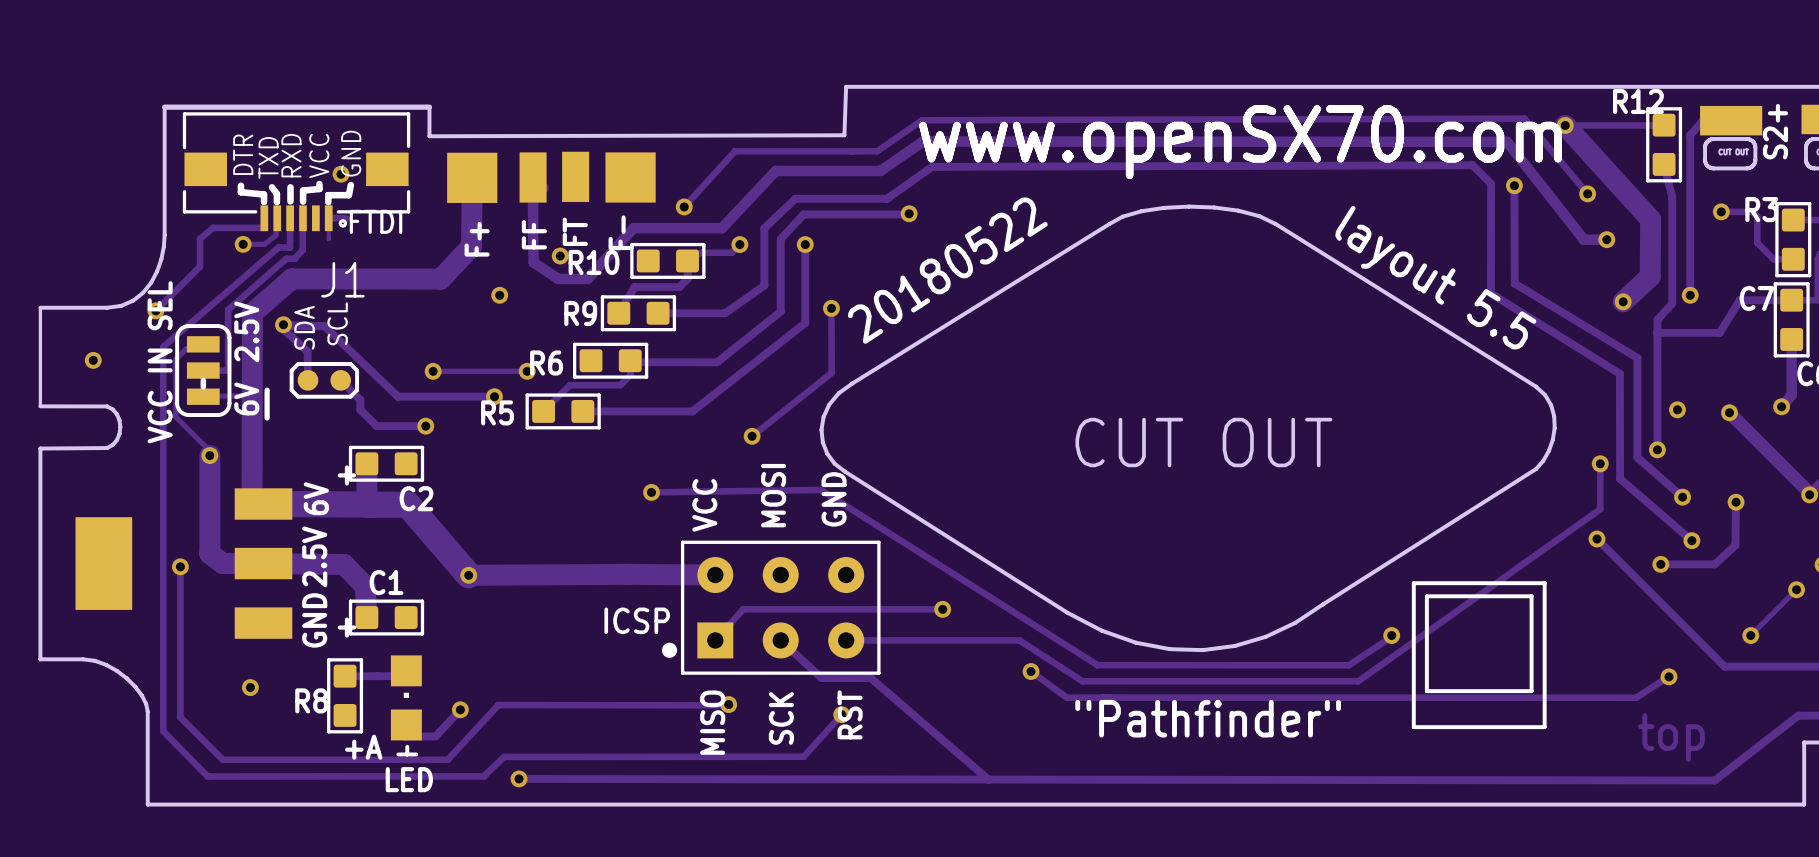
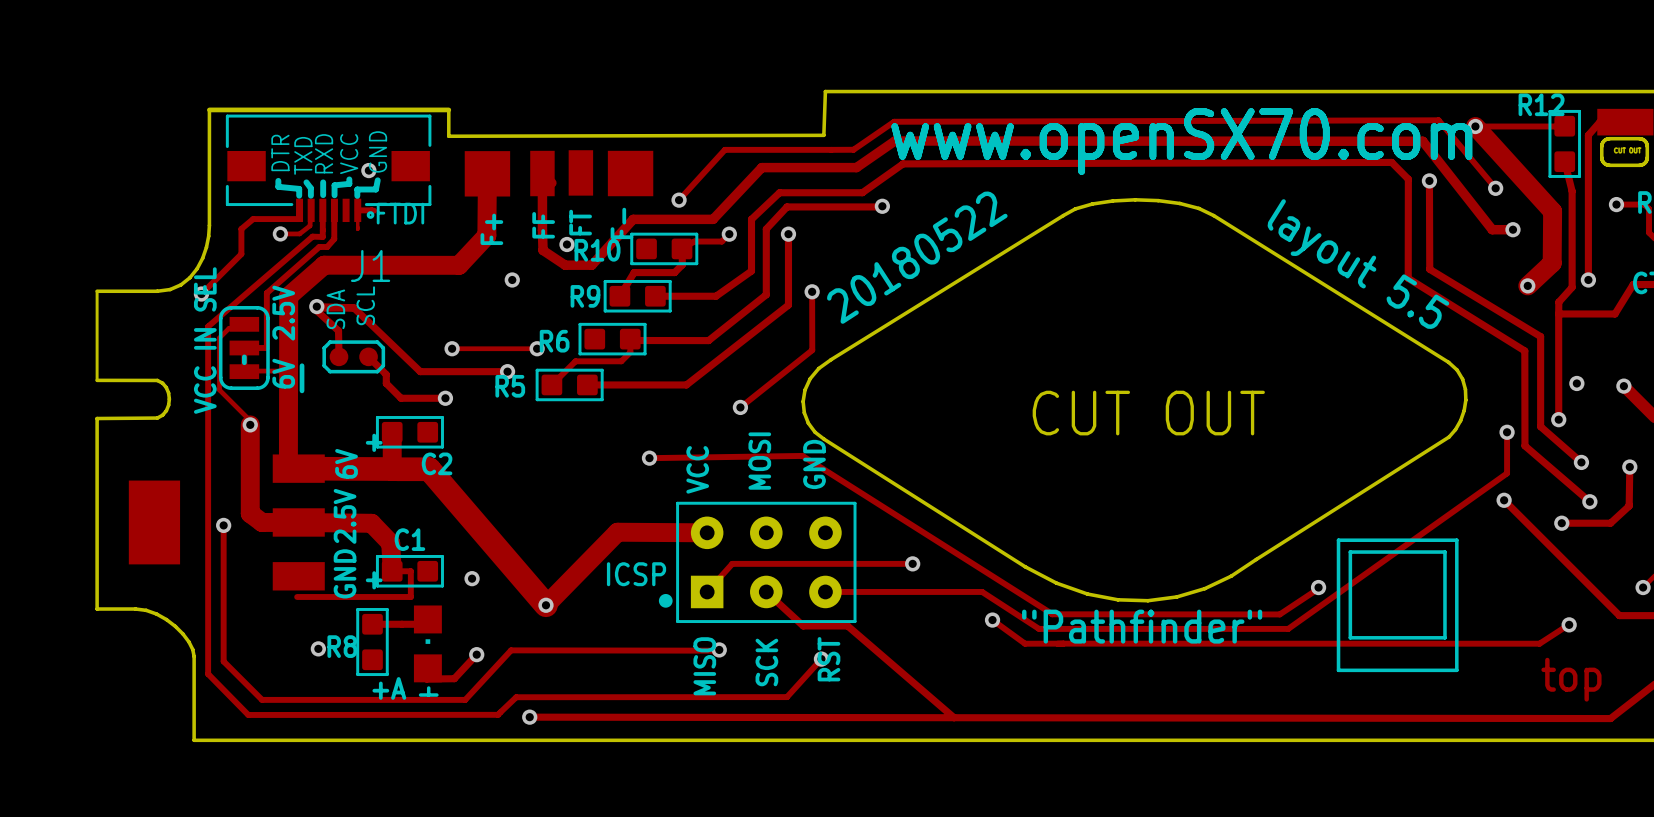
via: (93, 360) -> none
track: (407, 504) (468, 575) (715, 575) -> (429, 469) (545, 605) (617, 532) (707, 532)
via position: (468, 575) -> (472, 578)
track: none -> (392, 571) (410, 571) (410, 596) (297, 596)
via: none -> (545, 605)
via position: (250, 687) -> (318, 648)
text position: "Pathfinder" (1208, 718) -> "Pathfinder" (1142, 626)
text: LED (409, 779) -> none

